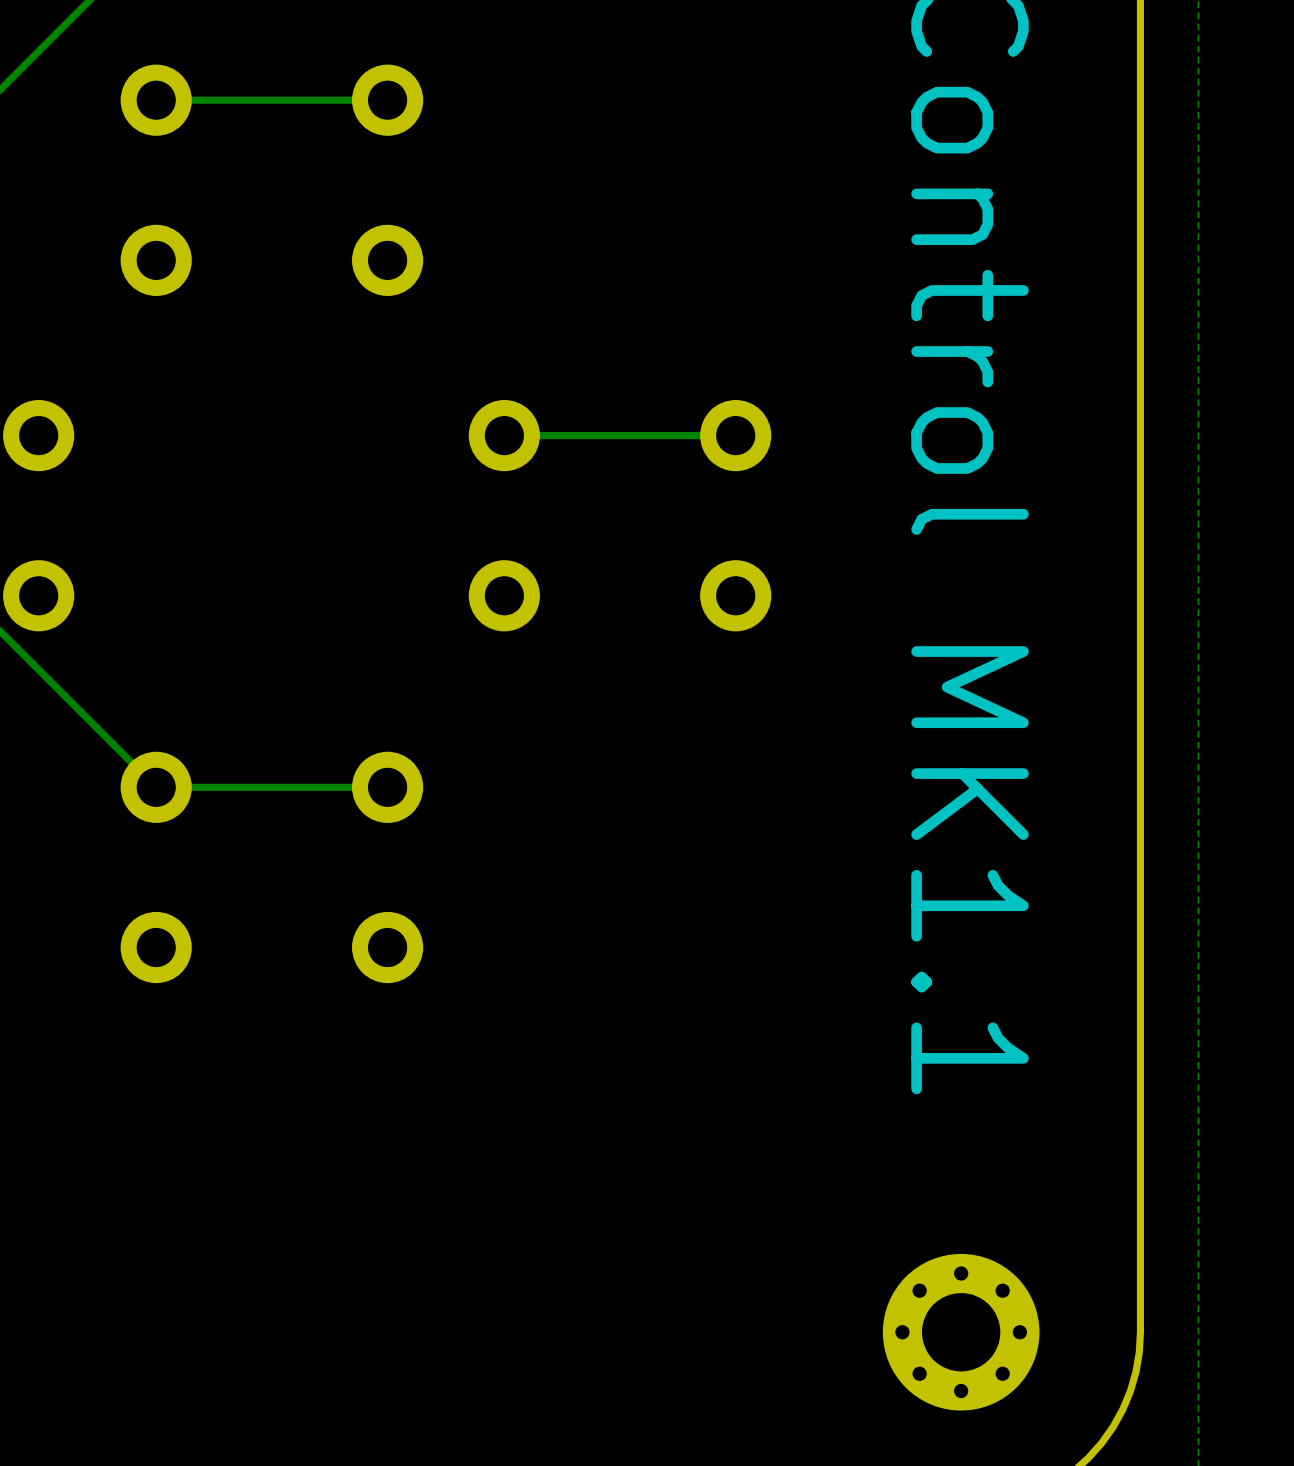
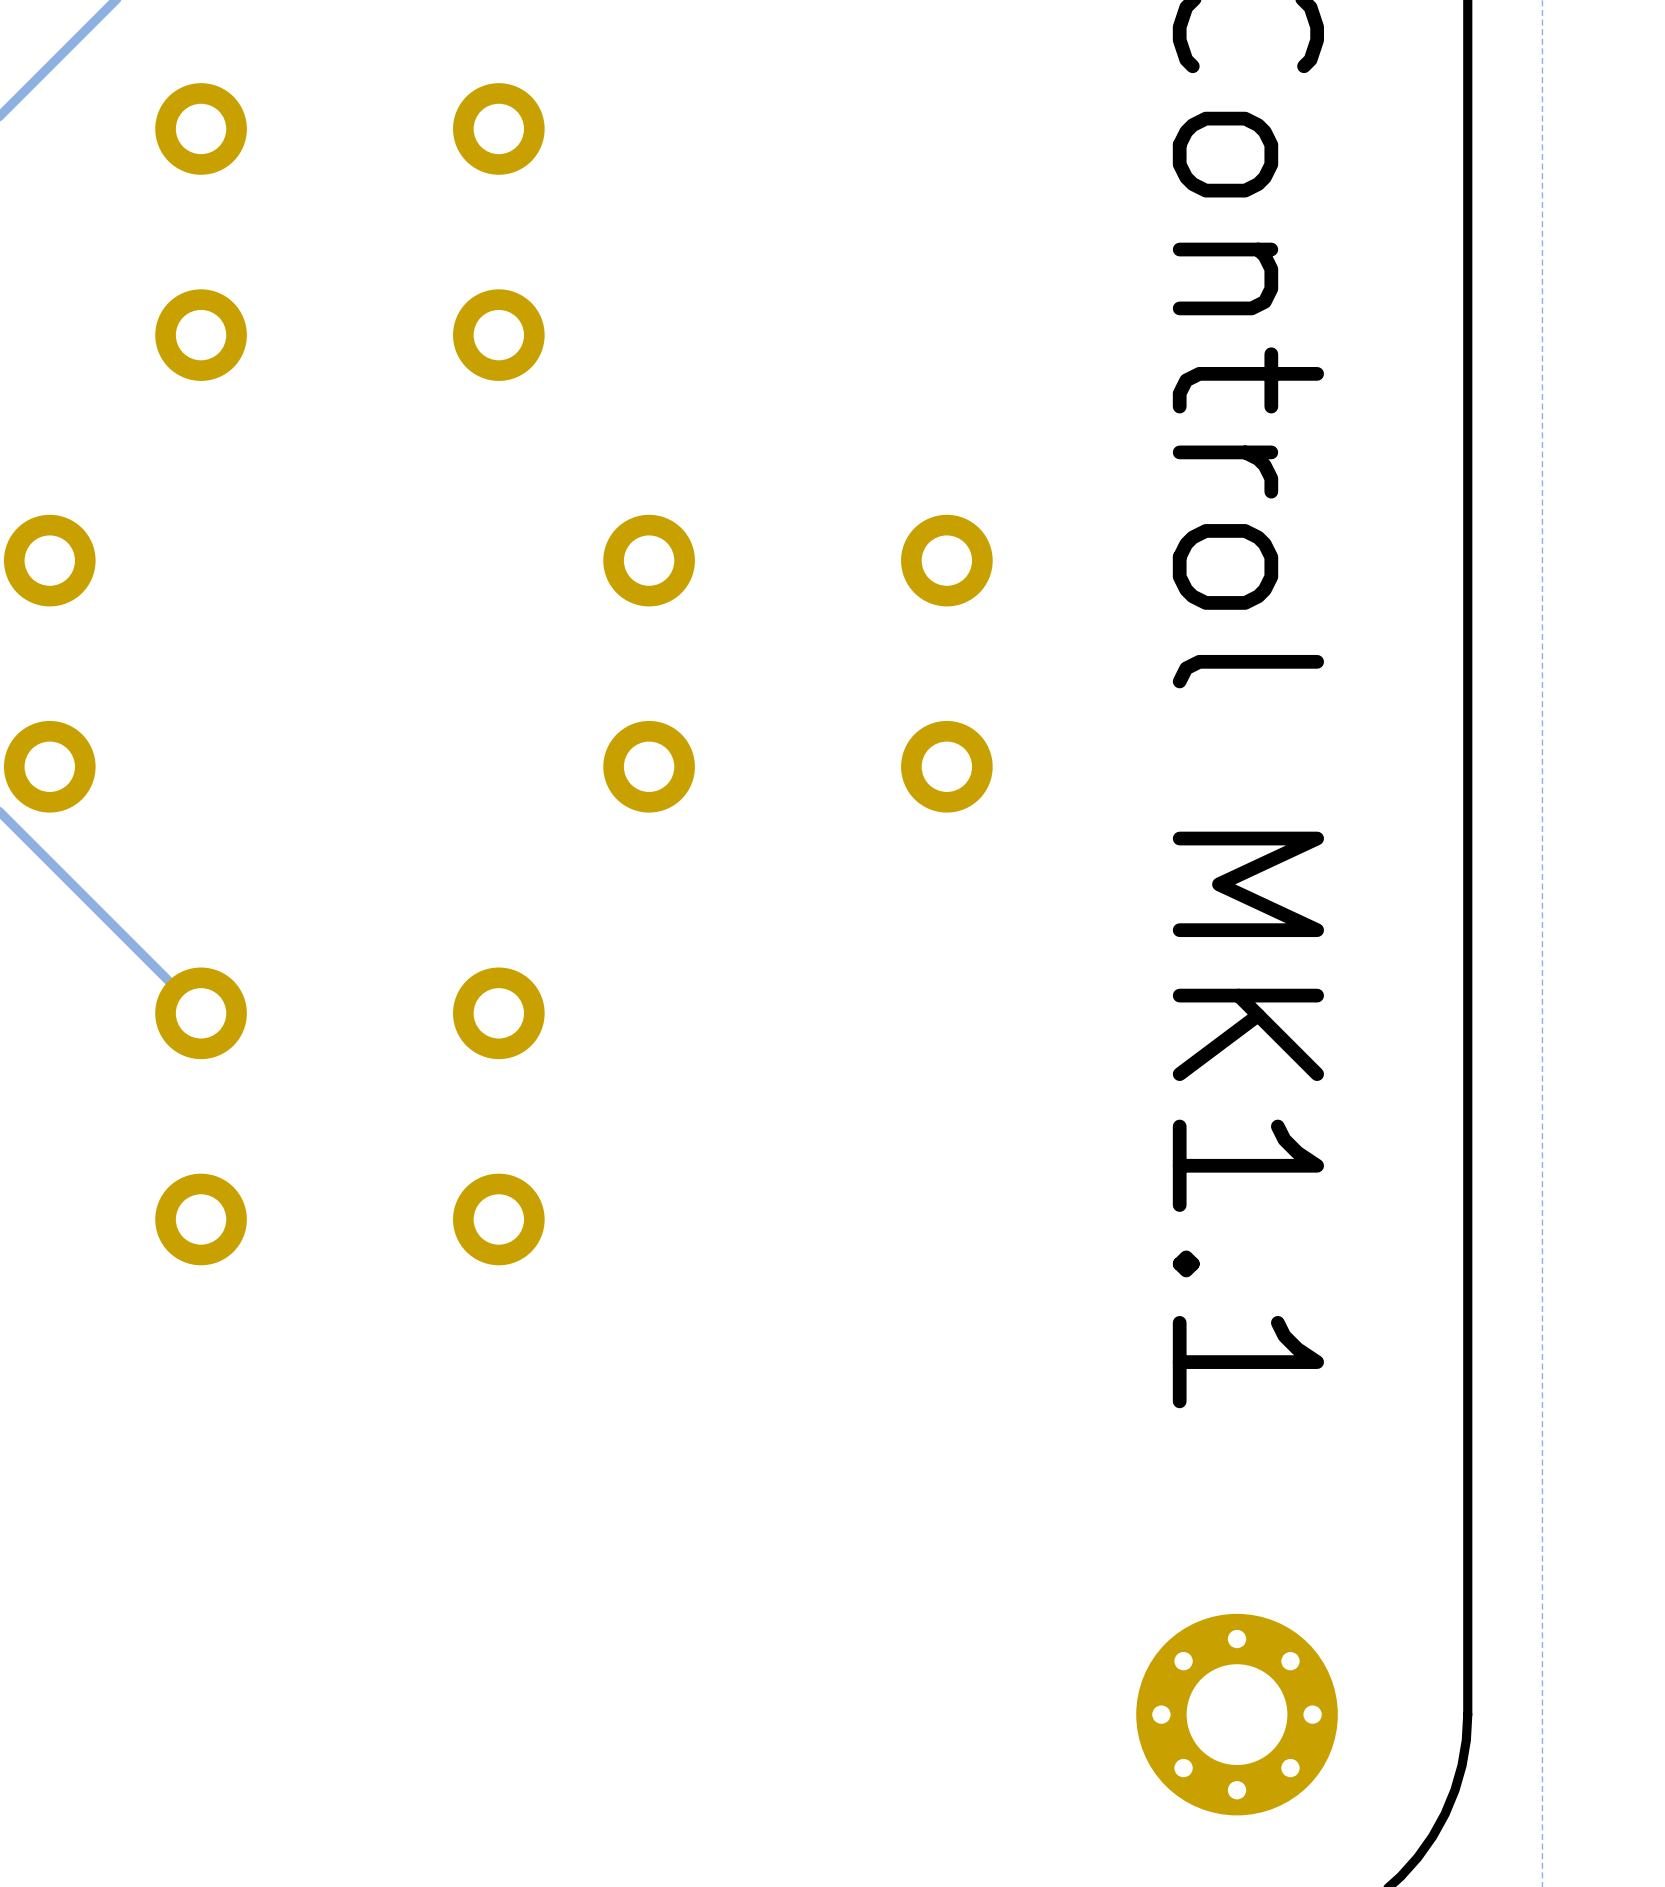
track: (387, 100) (156, 100) -> none
track: (735, 435) (504, 435) -> none
track: (387, 787) (156, 787) -> none

